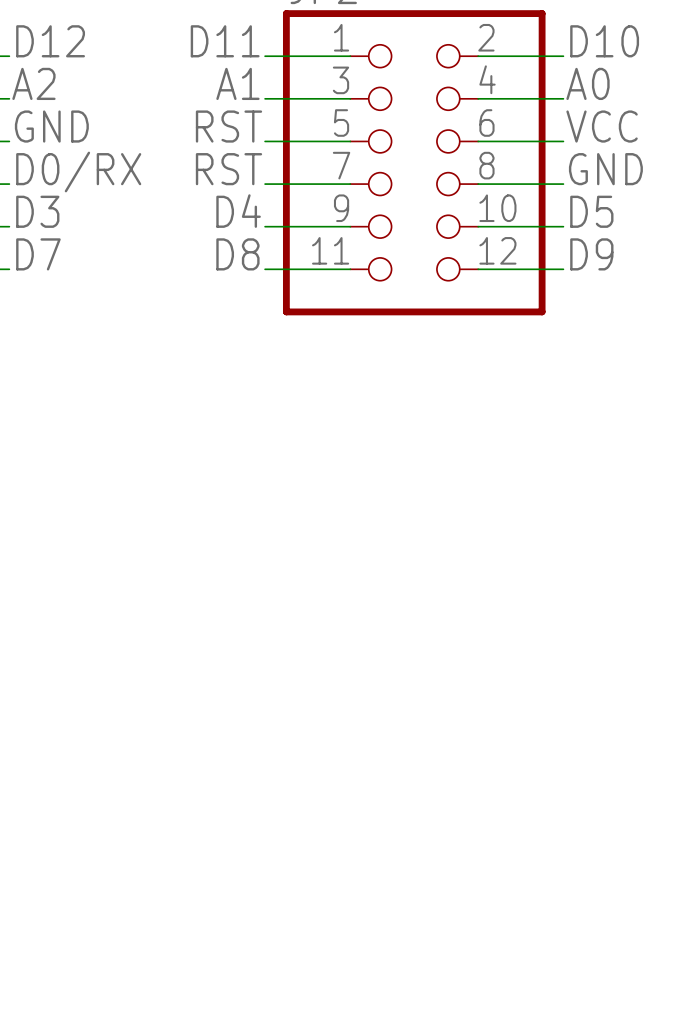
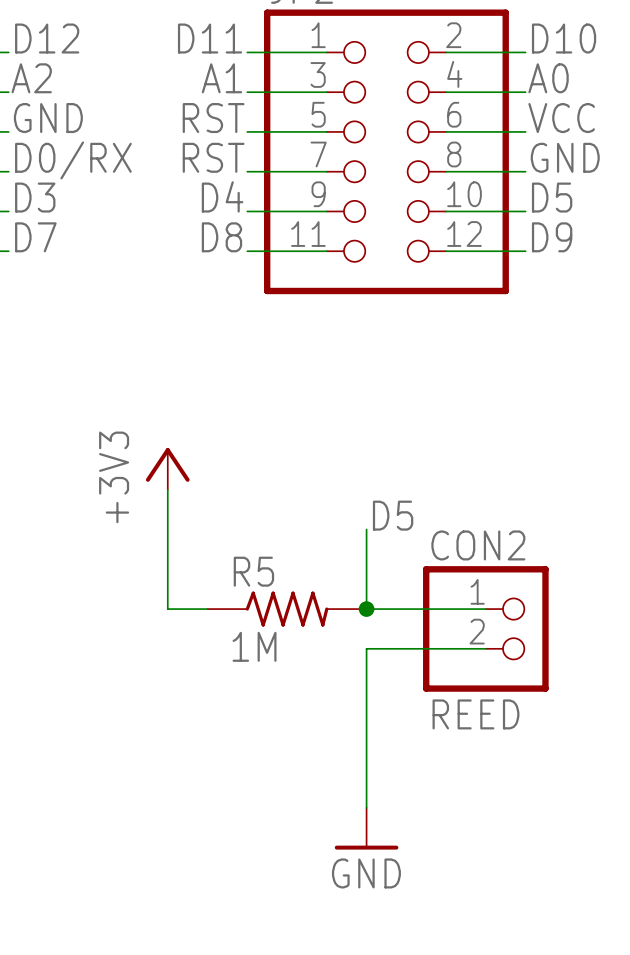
power symbol: none -> +3V3 (167, 468)
wire: none -> (167, 489) (167, 609) (207, 609)
label: none -> D5 (393, 515)
wire: none -> (366, 529) (366, 609) (485, 609)
R5: none -> 1M (287, 609)
junction: none -> (366, 609)
CON2: none -> REED (485, 628)
wire: none -> (485, 648) (366, 648) (366, 807)
power symbol: none -> GND (366, 828)

